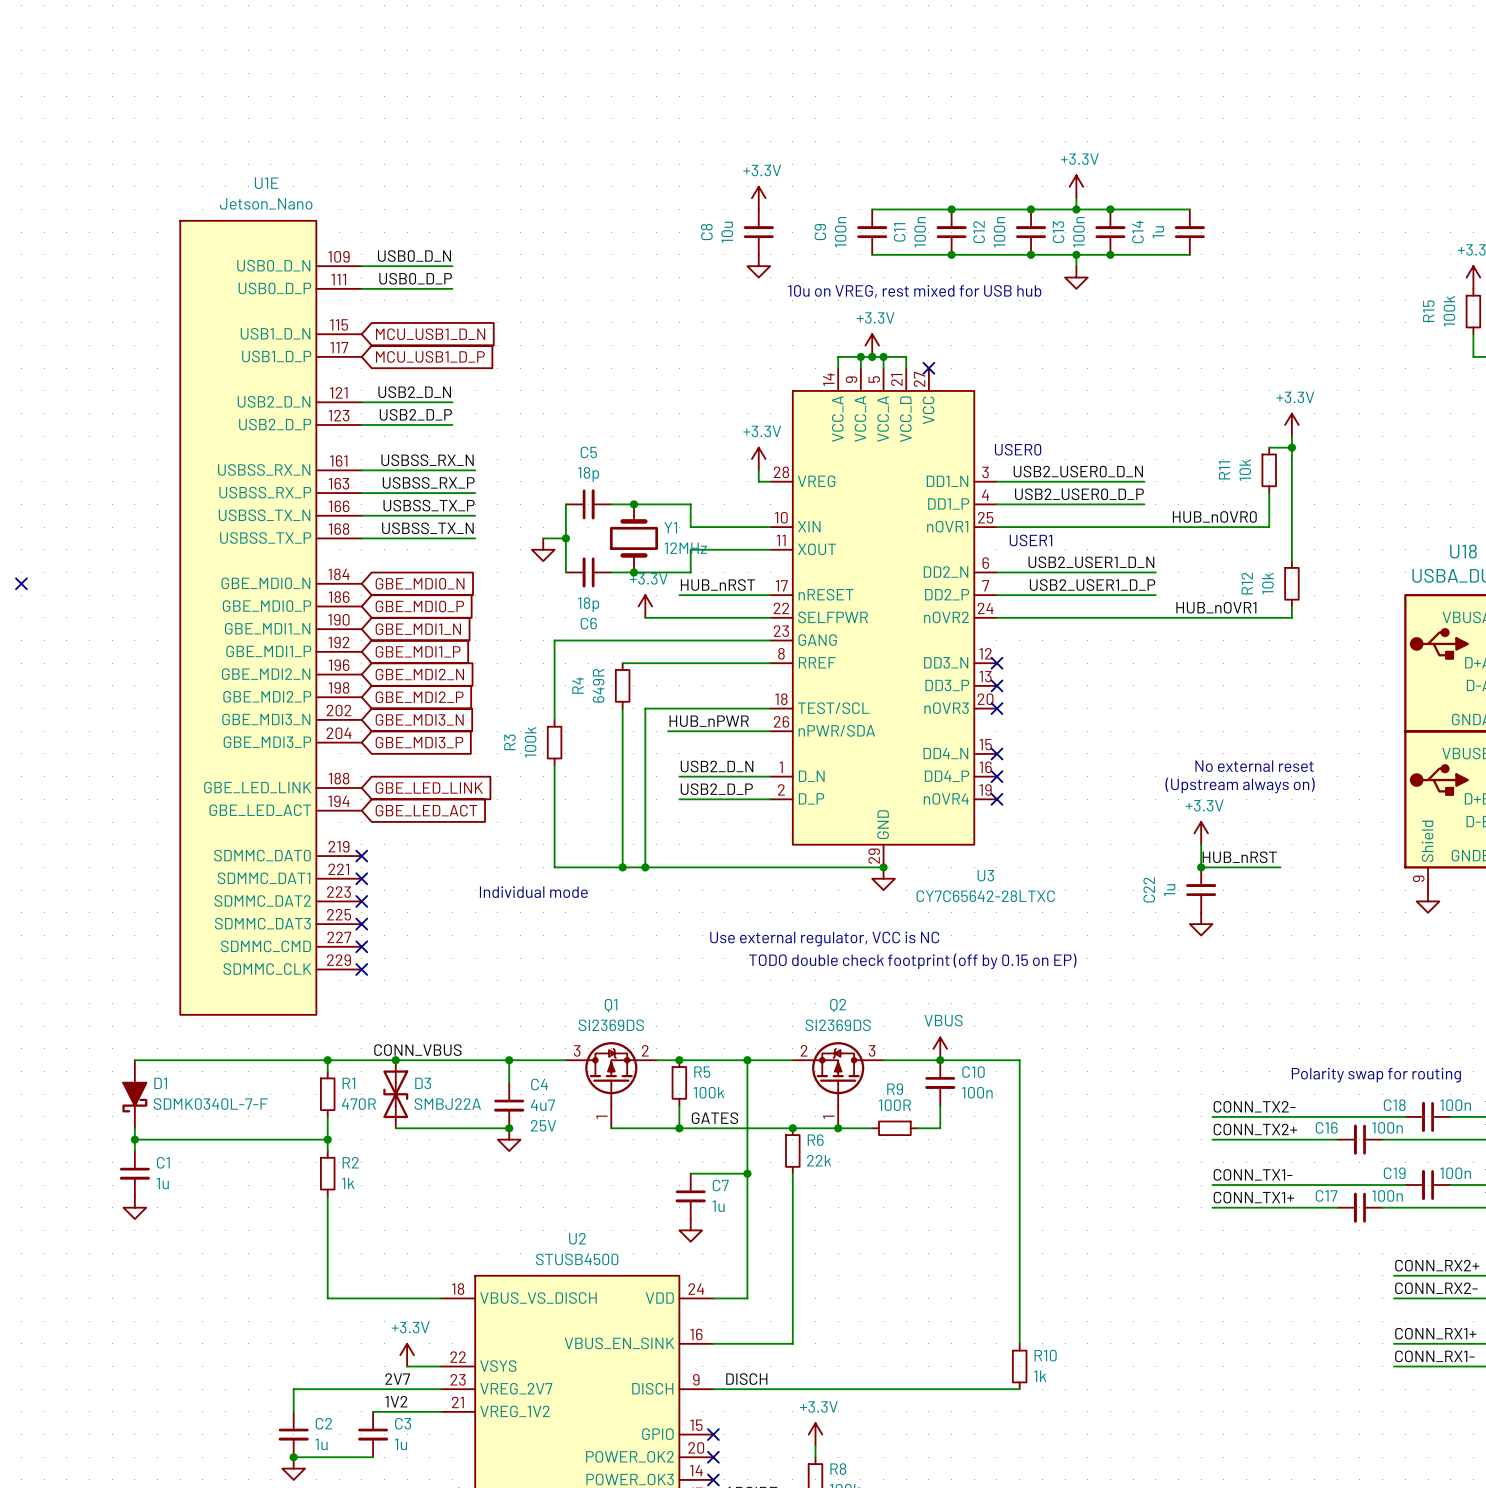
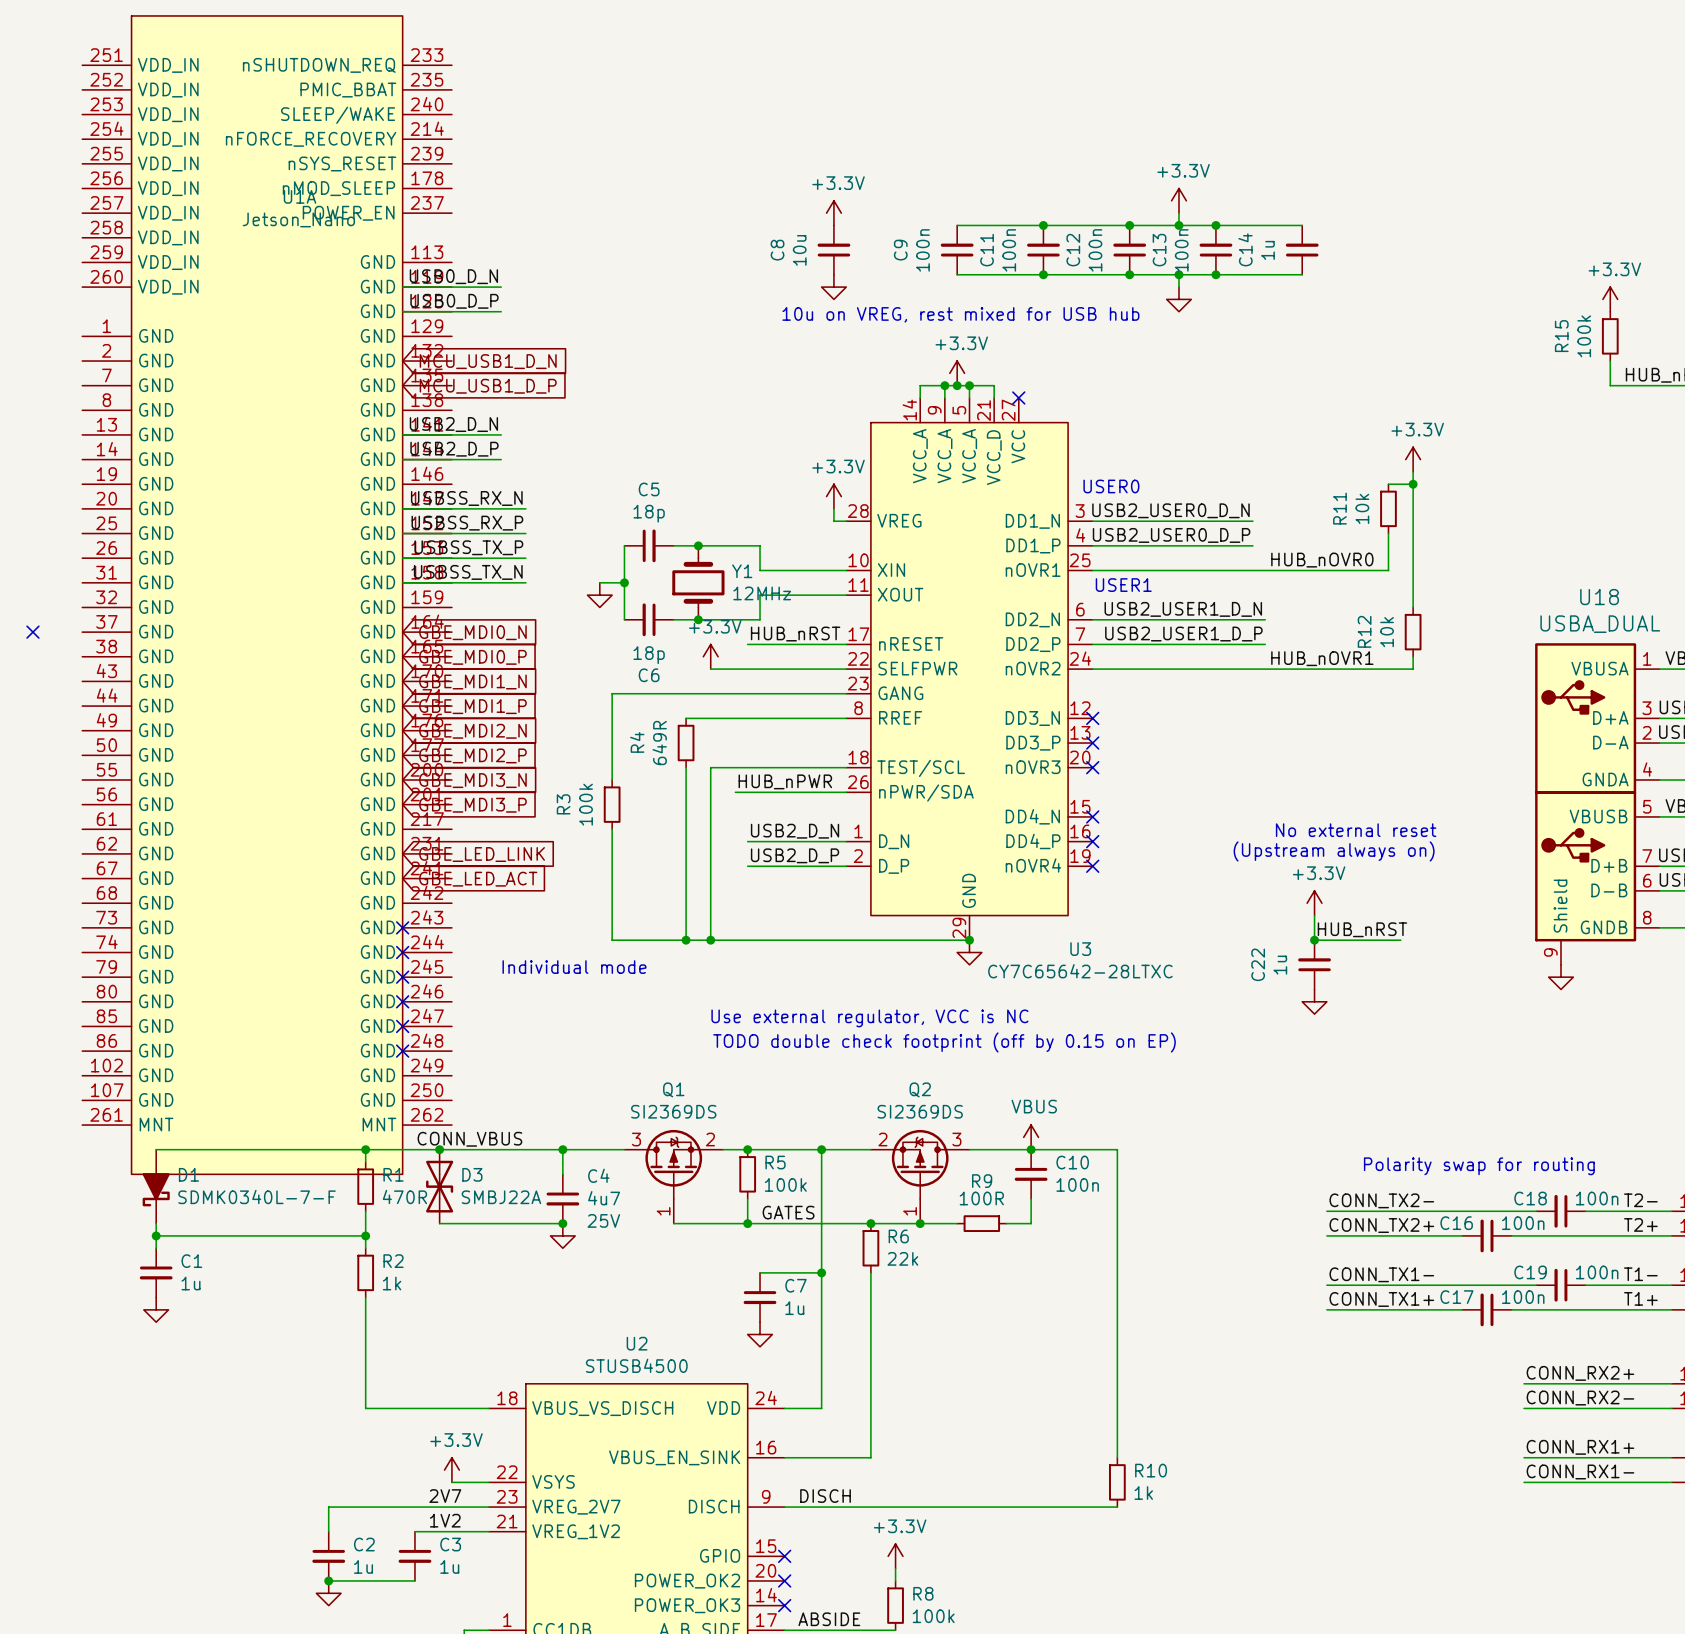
U1A: none -> Jetson_Nano (267, 595)
U1E: Jetson_Nano (270, 617) -> none

